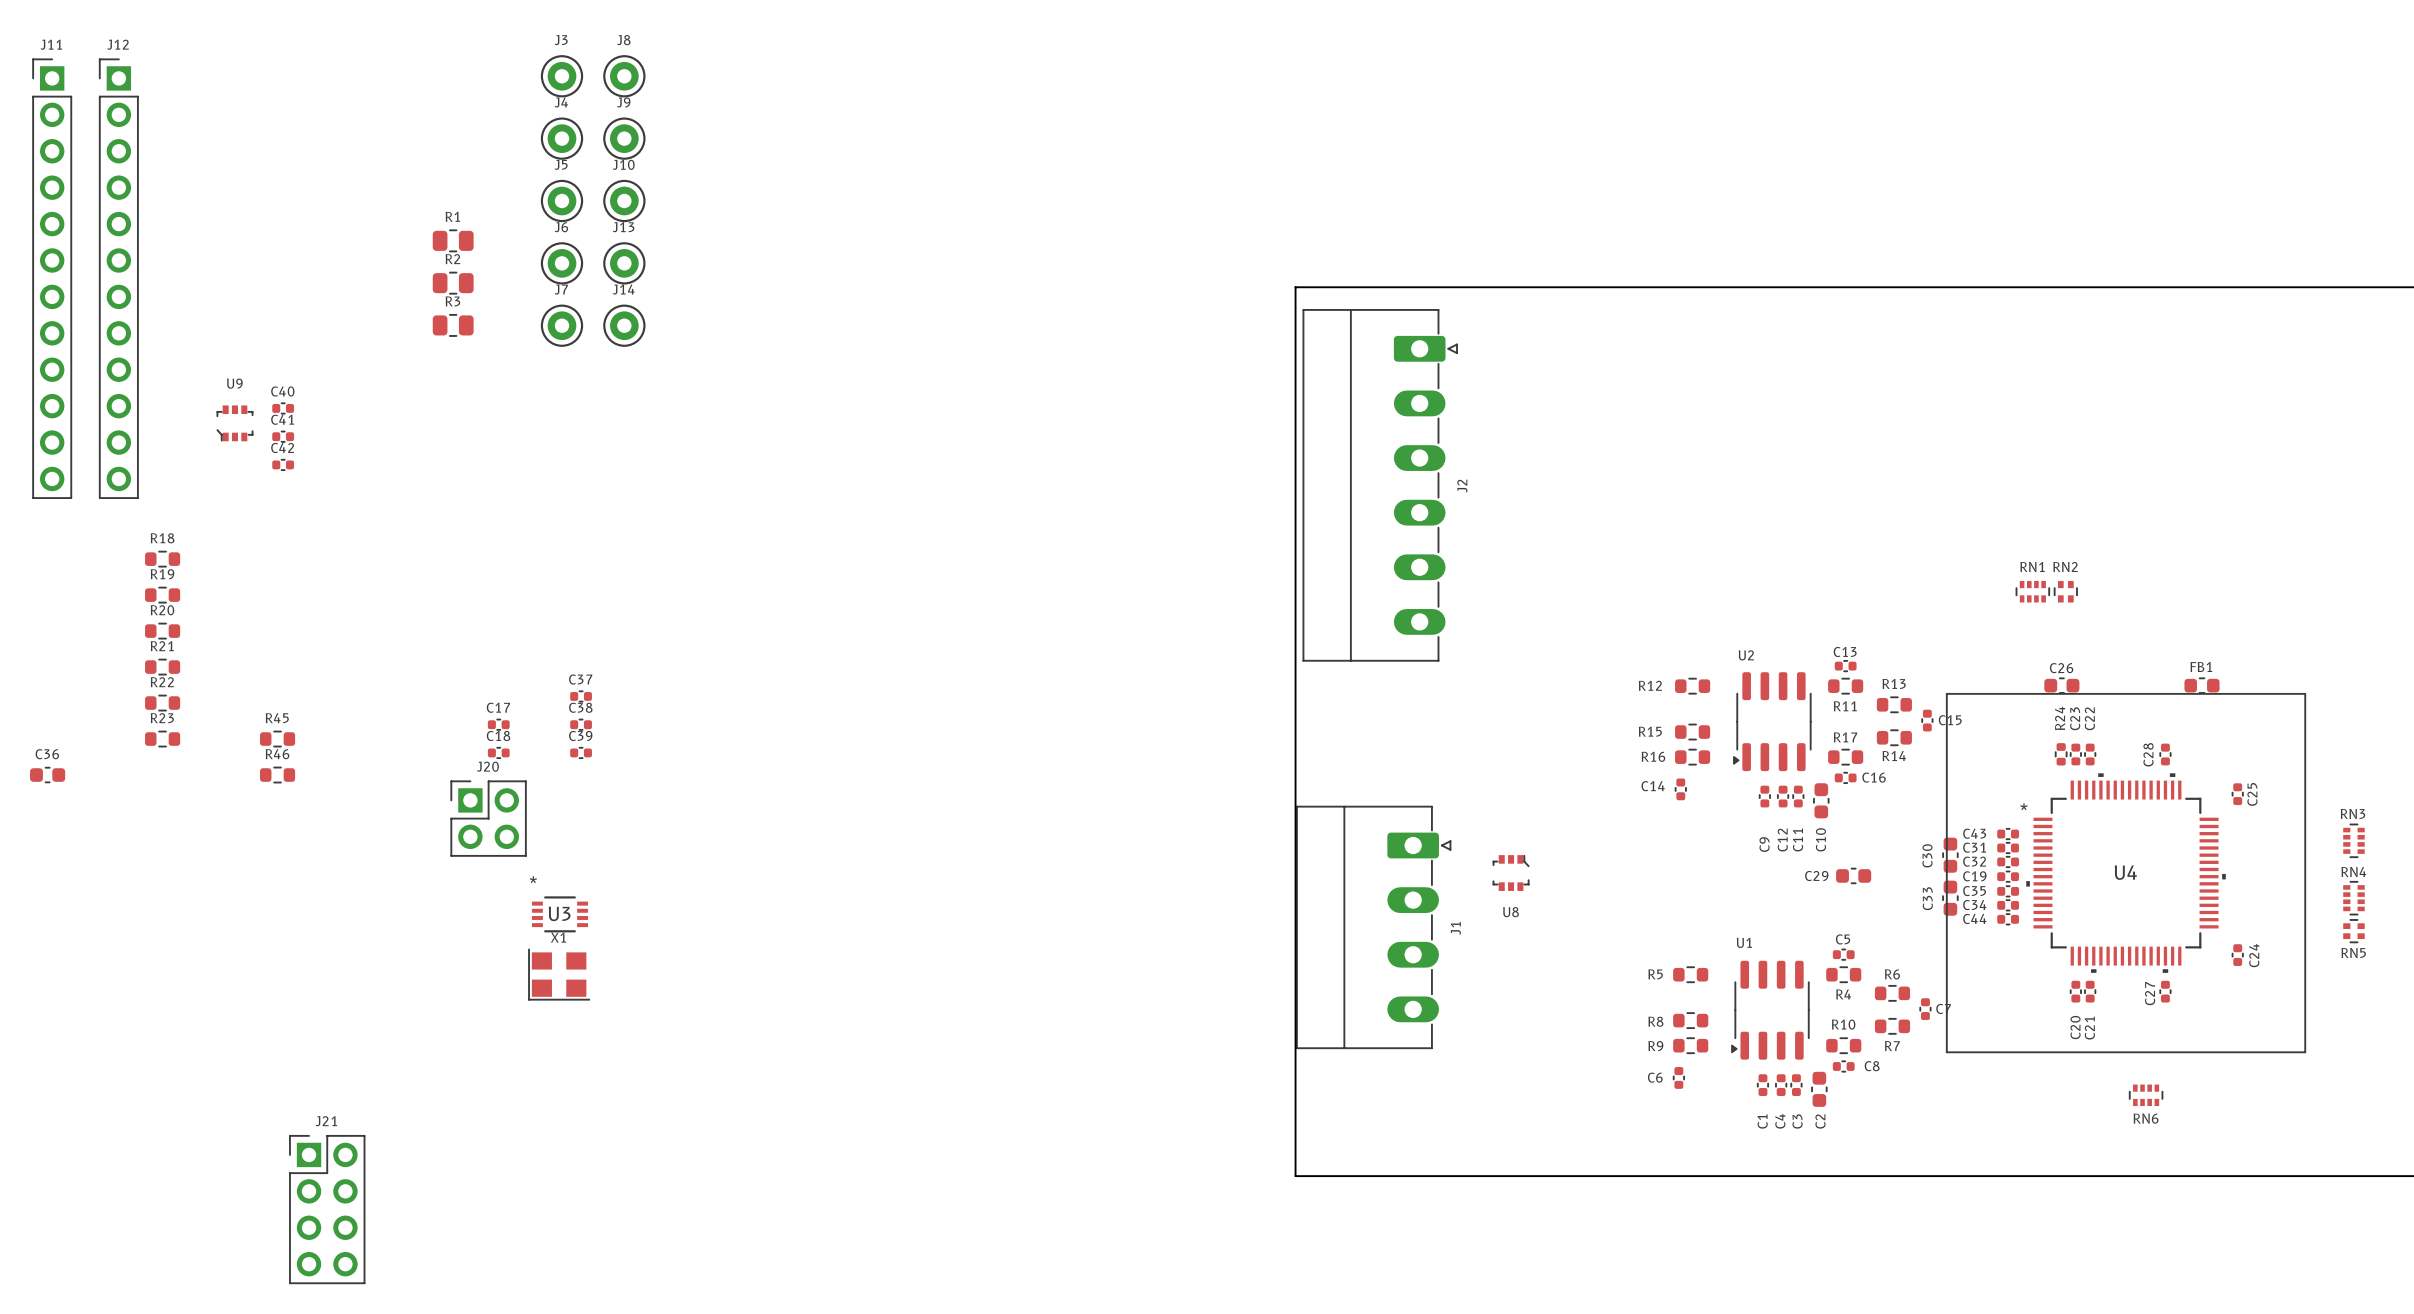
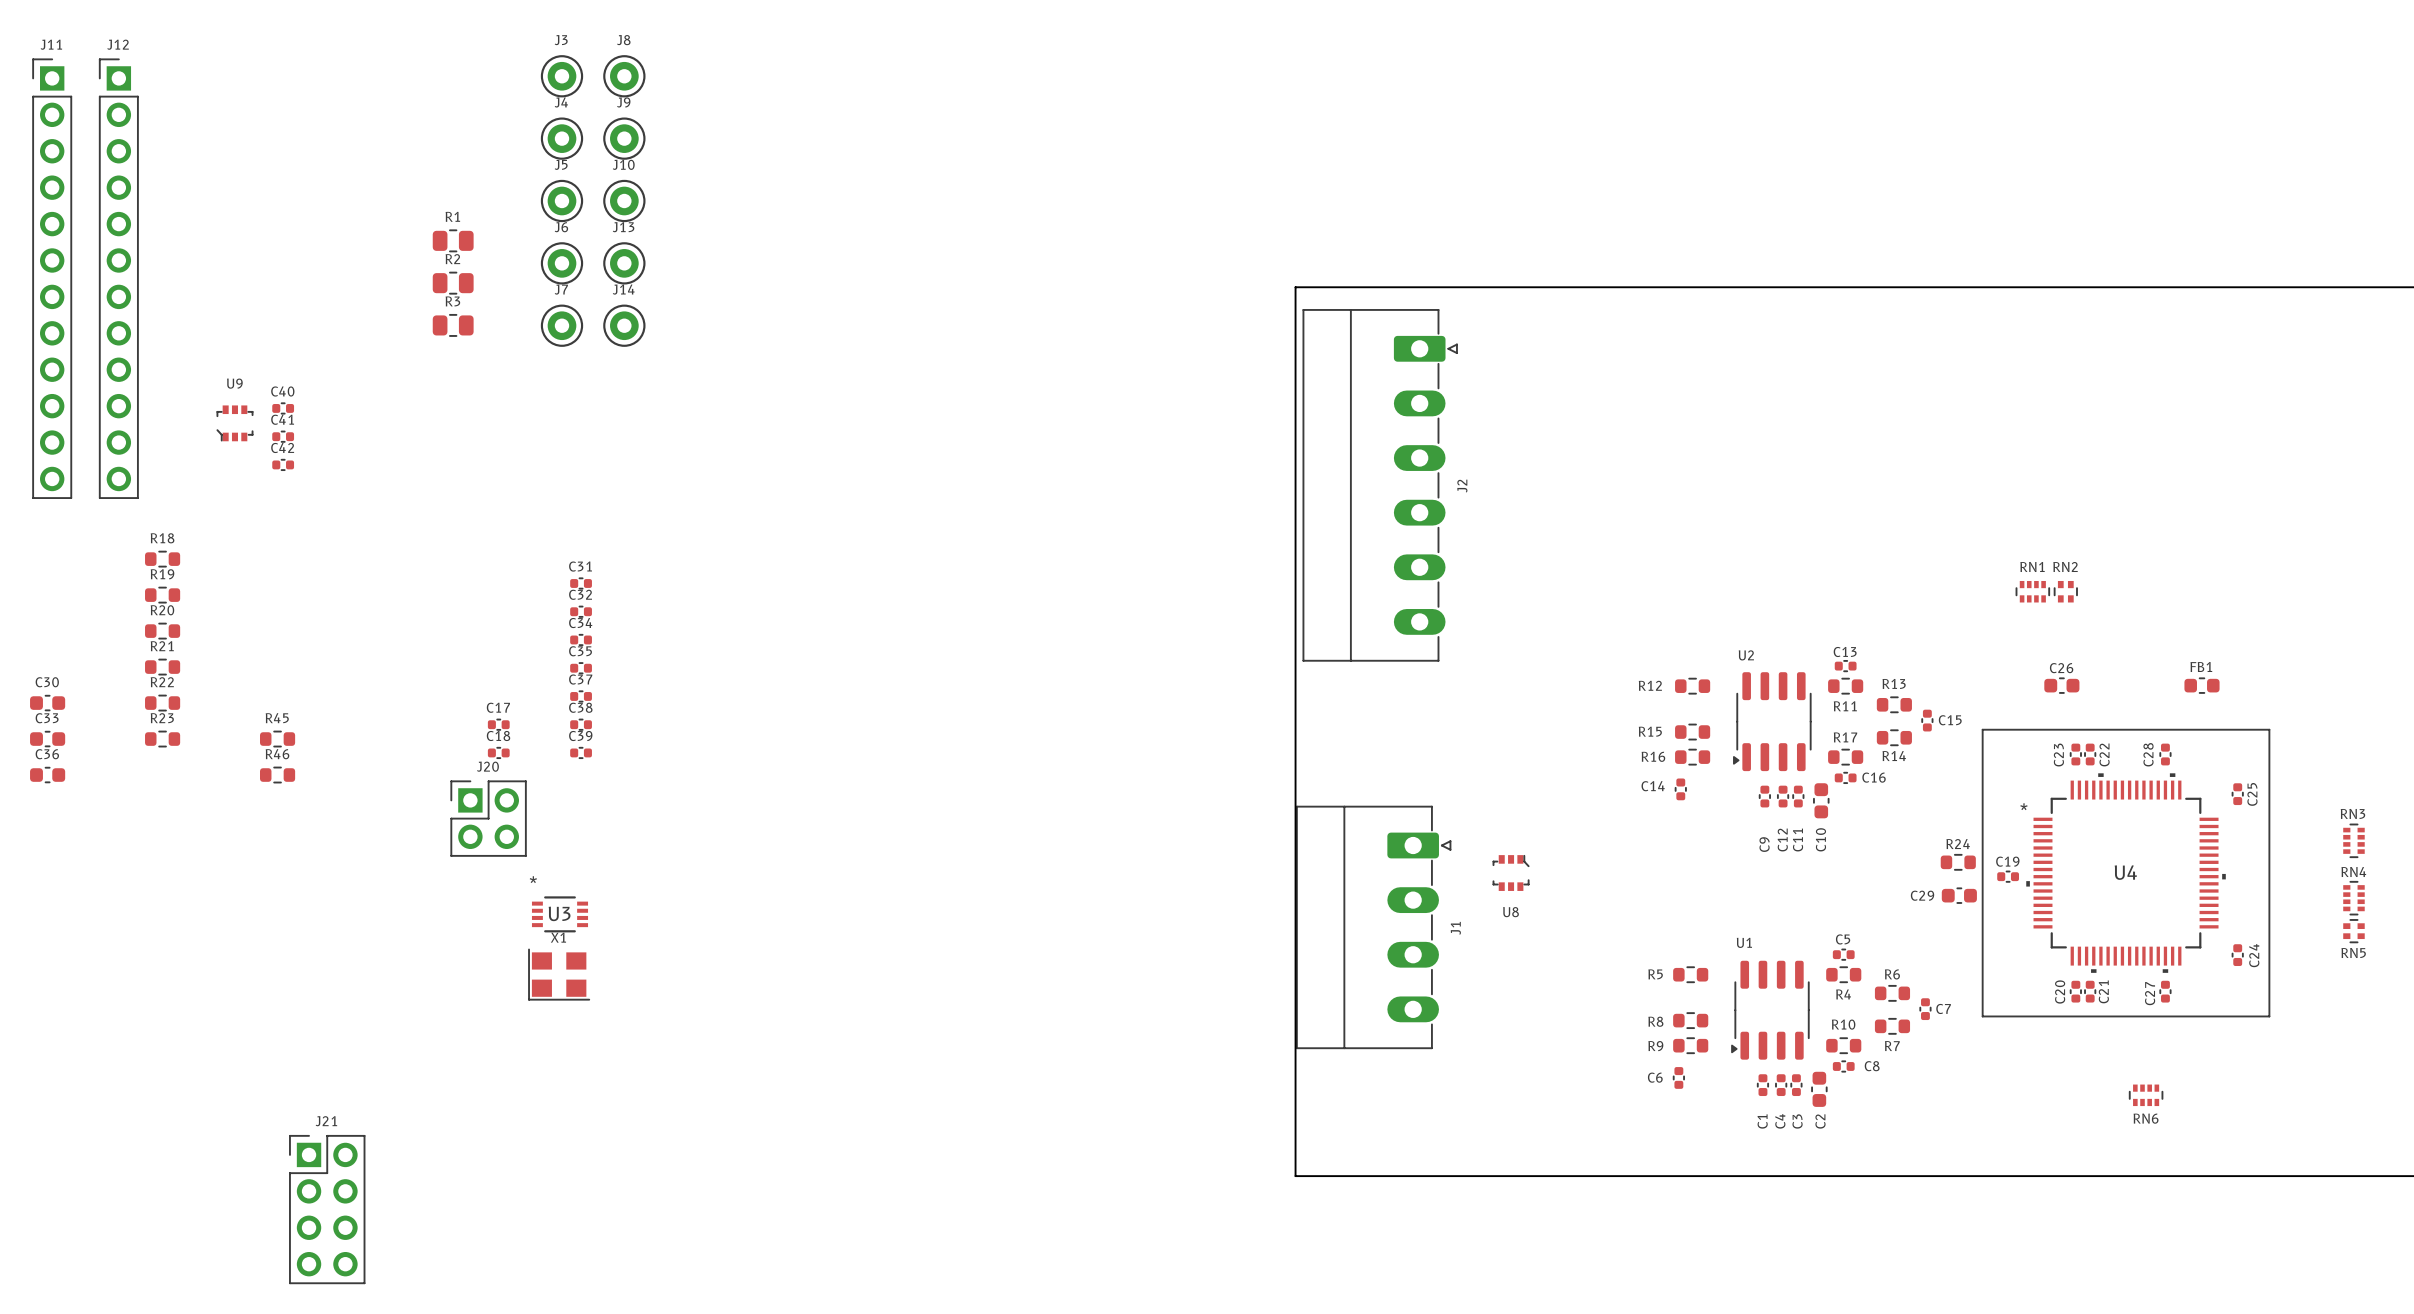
line: (1946, 693) (2305, 693) (2305, 1052) (1946, 1052) (1946, 693) -> (1982, 729) (1982, 1016) (2269, 1016) (2269, 729) (1982, 729)
C23 name position: C23 (2075, 718) -> C23 (2058, 755)
C22 name position: C22 (2089, 718) -> C22 (2104, 754)
R24 footprint: [2054, 743, 2068, 766] -> [1940, 853, 1976, 871]
C43: (2008, 834) -> none
C31 name position: C31 (1974, 847) -> C31 (580, 566)
C31 position: (2008, 848) -> (581, 583)
C30 rotation: 0° (1950, 855) -> 90° clockwise (47, 703)
C30 position: (1950, 855) -> (47, 703)
C32 name position: C32 (1974, 861) -> C32 (580, 594)
C32 position: (2008, 861) -> (581, 611)
C29 position: (1853, 875) -> (1959, 895)
C19 name position: C19 (1974, 876) -> C19 (2007, 861)
C35 name position: C35 (1974, 891) -> C35 (580, 651)
C35 position: (2008, 891) -> (581, 668)
C33 rotation: 0° (1950, 898) -> 90° clockwise (47, 739)
C33 position: (1950, 898) -> (47, 739)
C34 name position: C34 (1974, 905) -> C34 (580, 623)
C34 position: (2008, 905) -> (581, 639)
C44: (2008, 919) -> none
C20 name position: C20 (2075, 1027) -> C20 (2060, 992)
C21 name position: C21 (2089, 1028) -> C21 (2103, 991)

